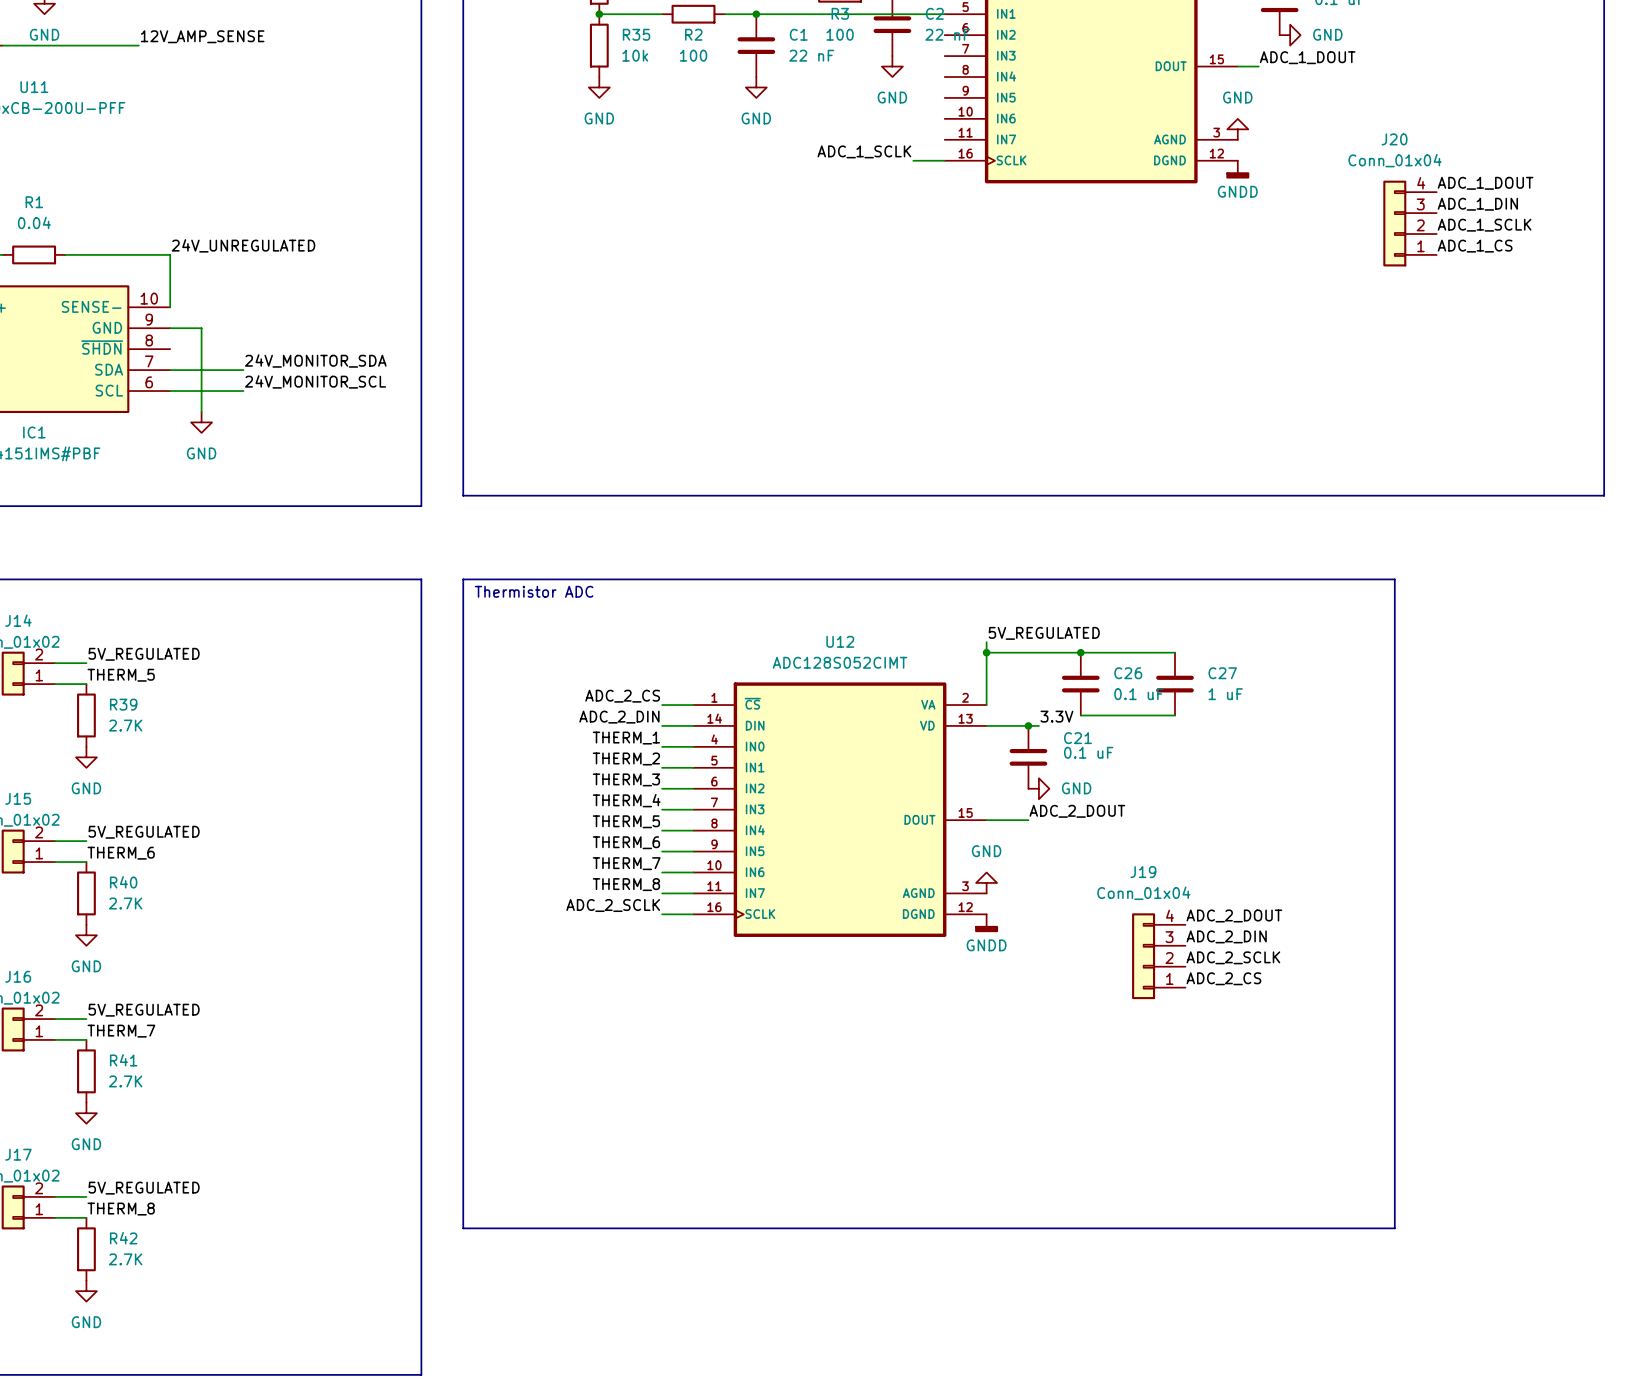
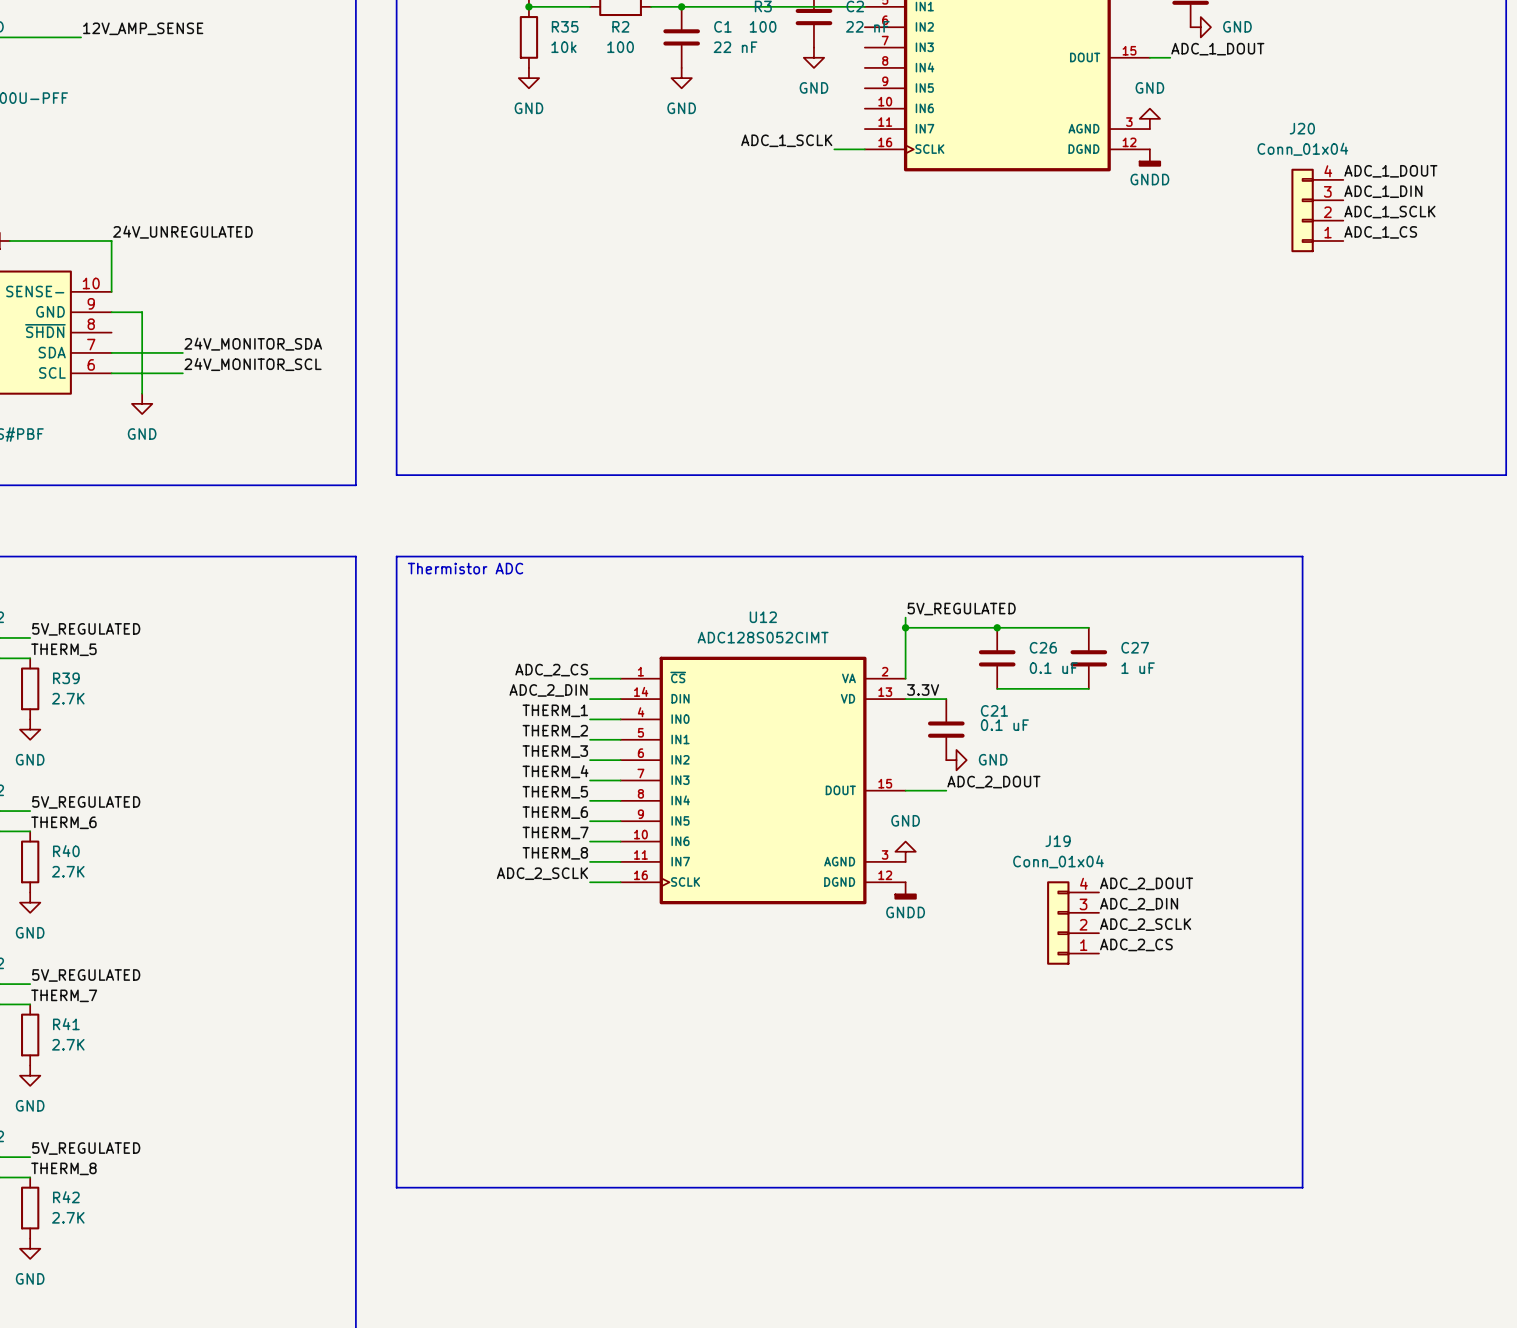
label position: 3.3V (1056, 716) -> 3.3V (923, 689)
wire: (1028, 725) (1038, 725) -> none
junction: (1028, 725) -> none

